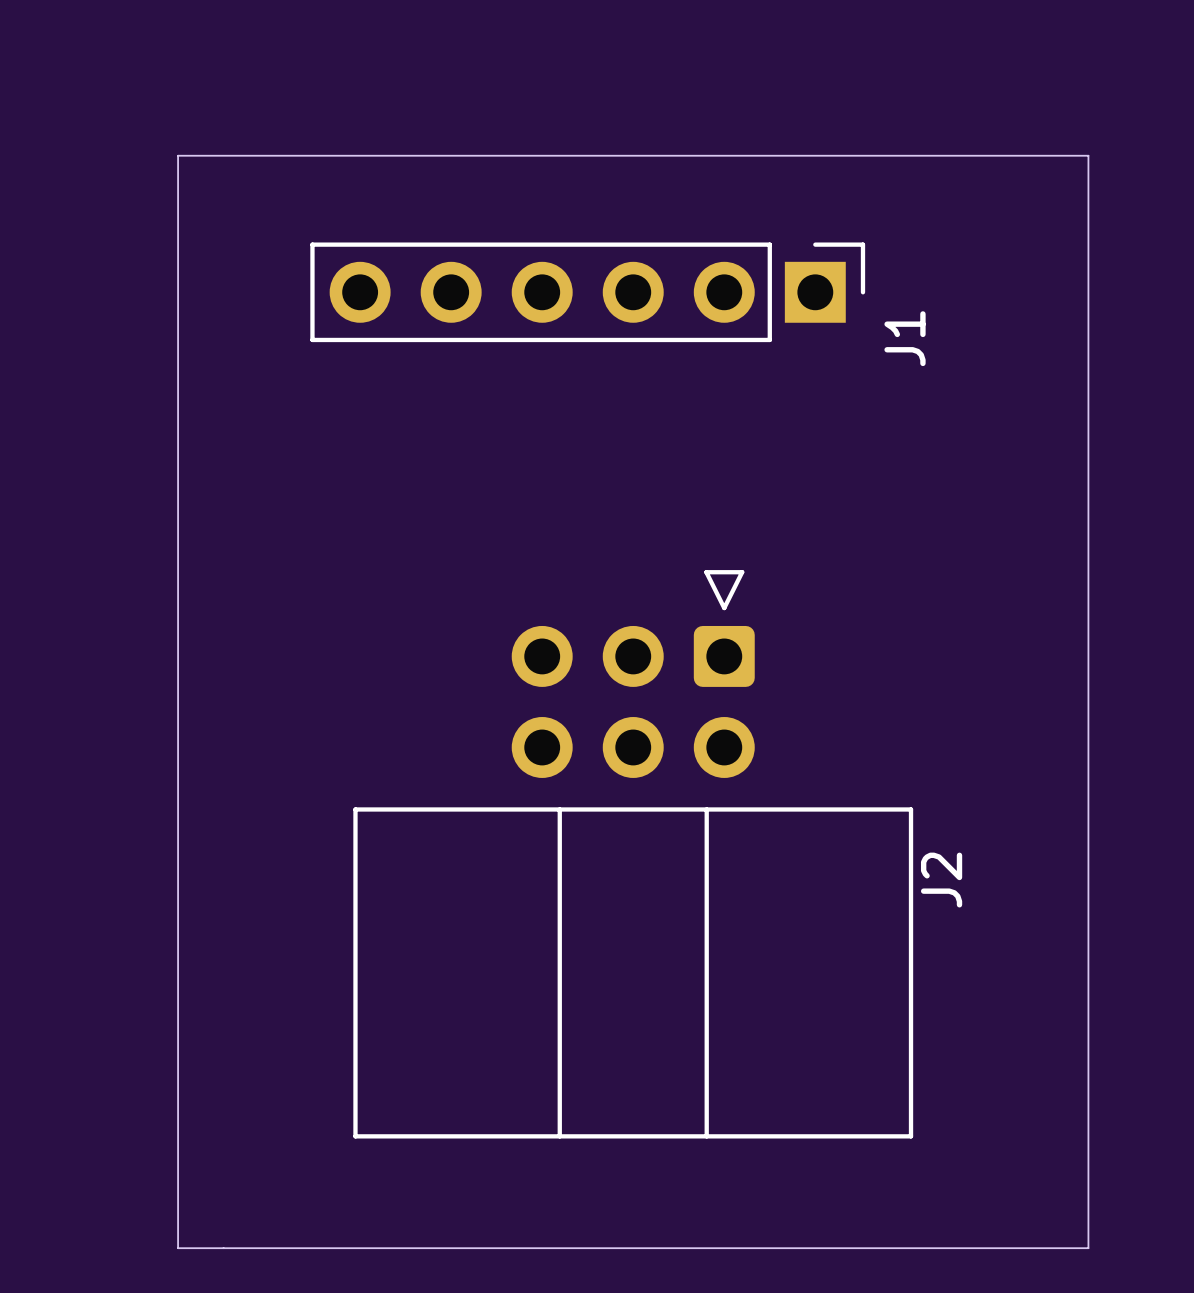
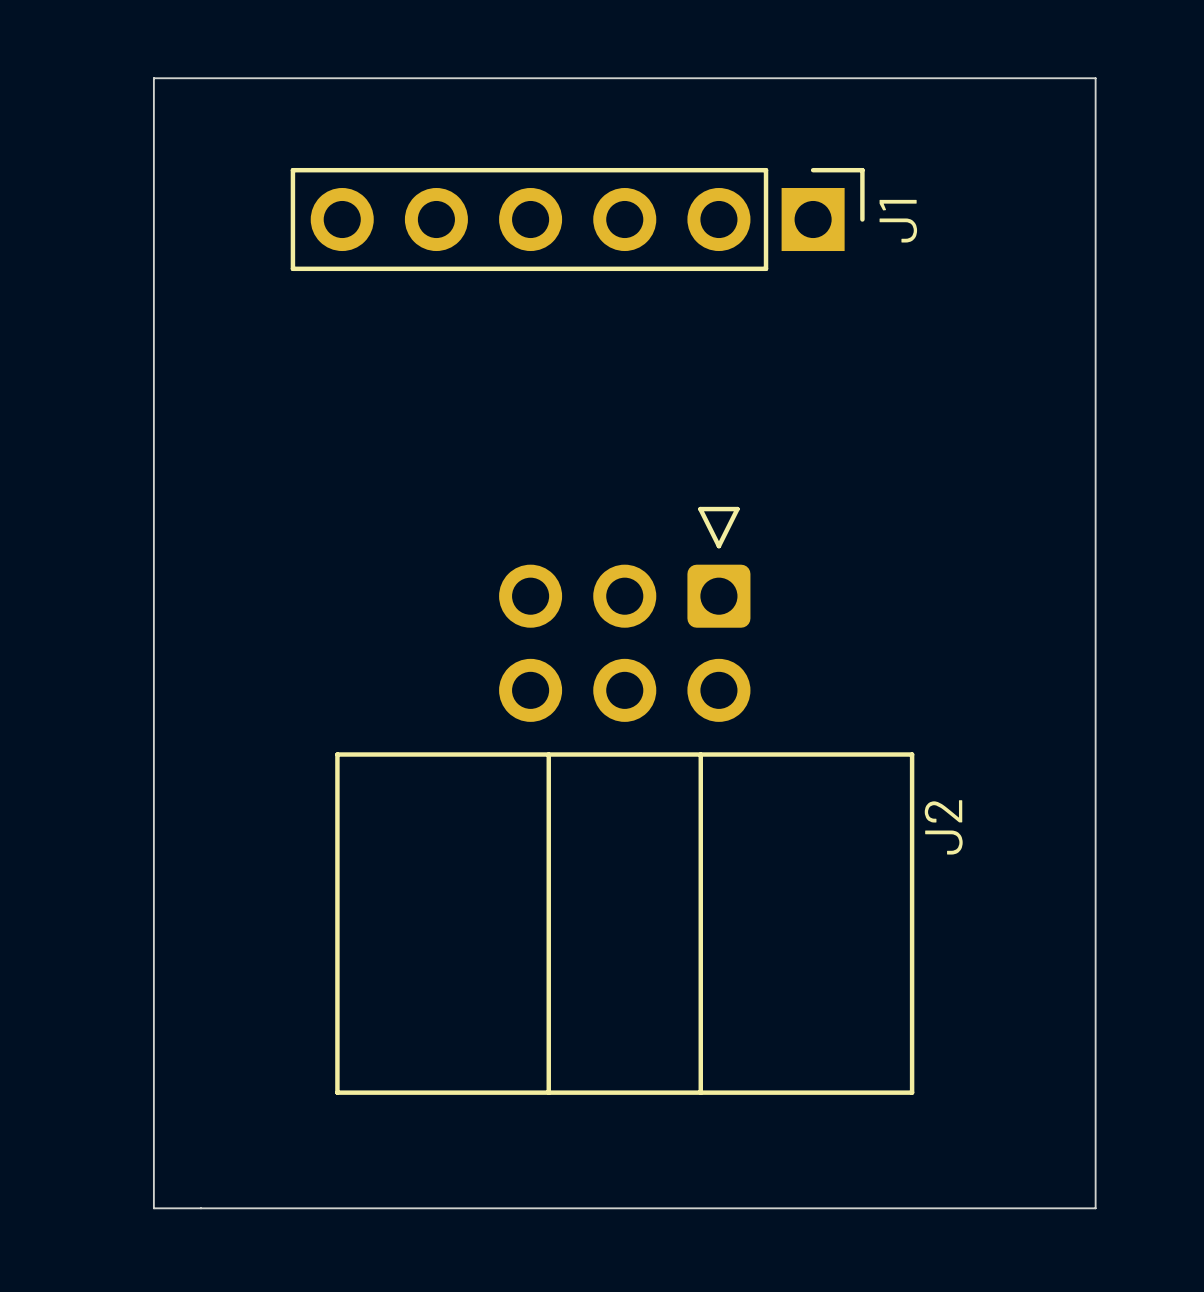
J1 name position: J1 (905, 338) -> J1 (898, 221)

